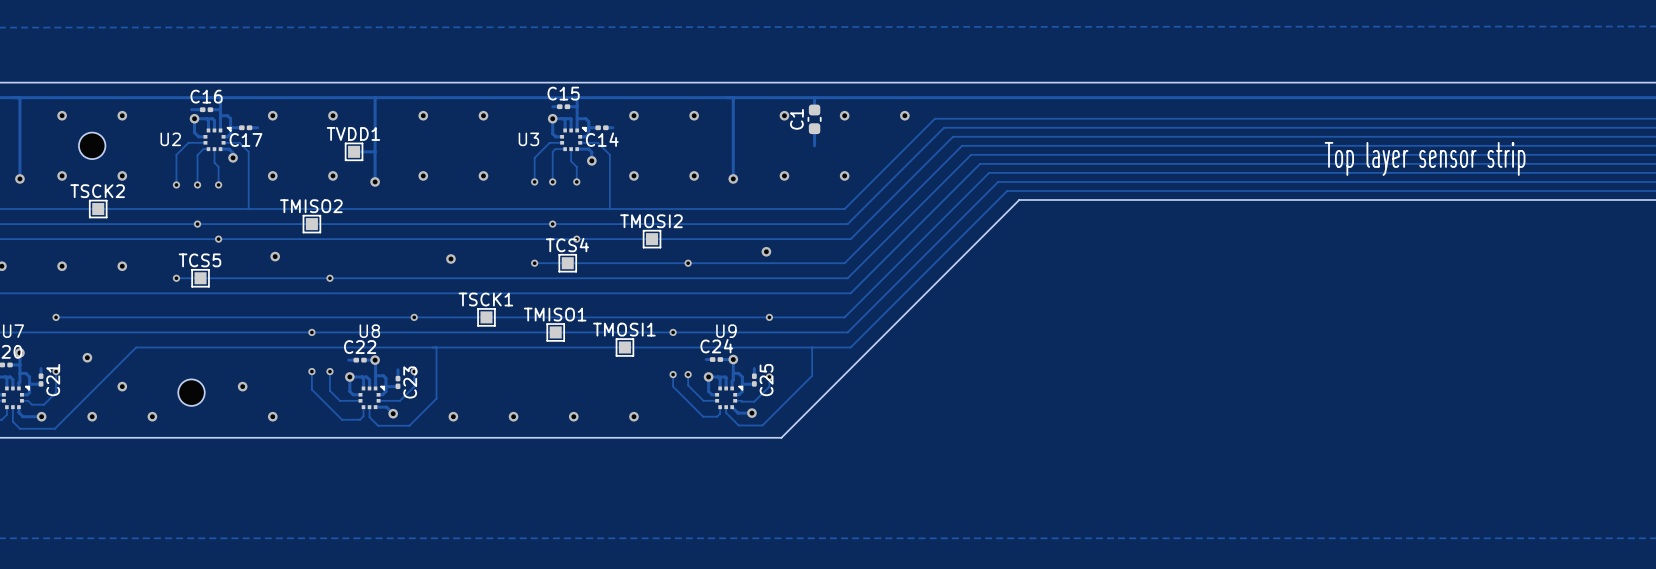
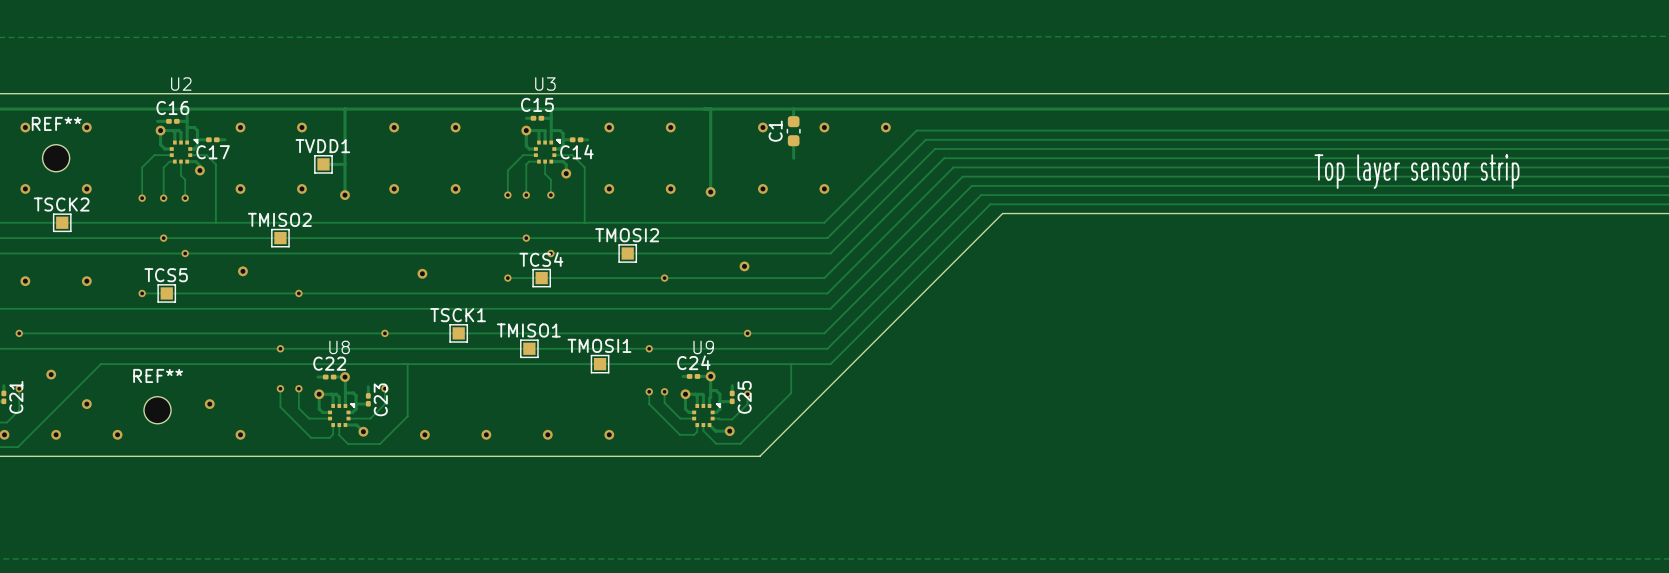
REF** name: none -> REF** (56, 123)
U2 name position: U2 (170, 139) -> U2 (181, 84)
U3 name position: U3 (528, 139) -> U3 (545, 84)
REF** name: none -> REF** (158, 375)

